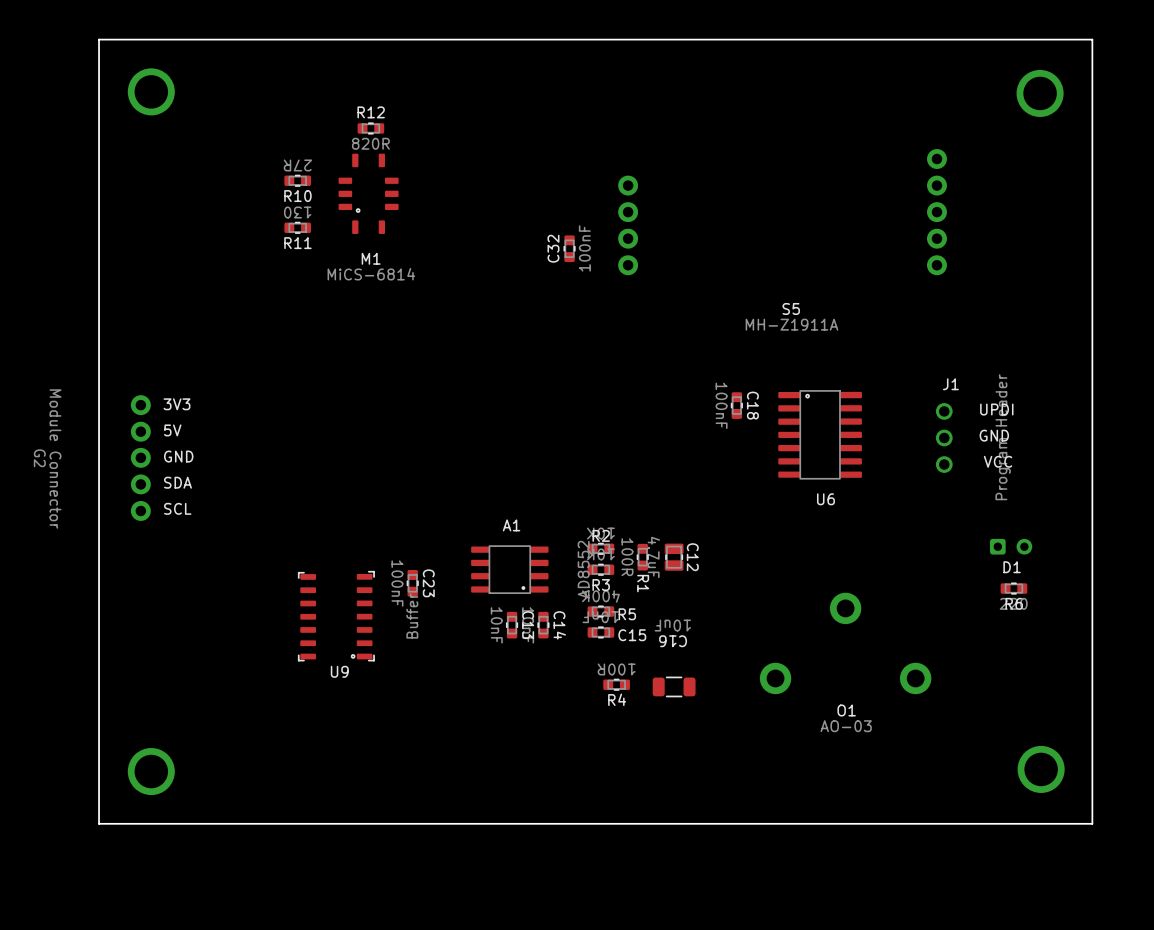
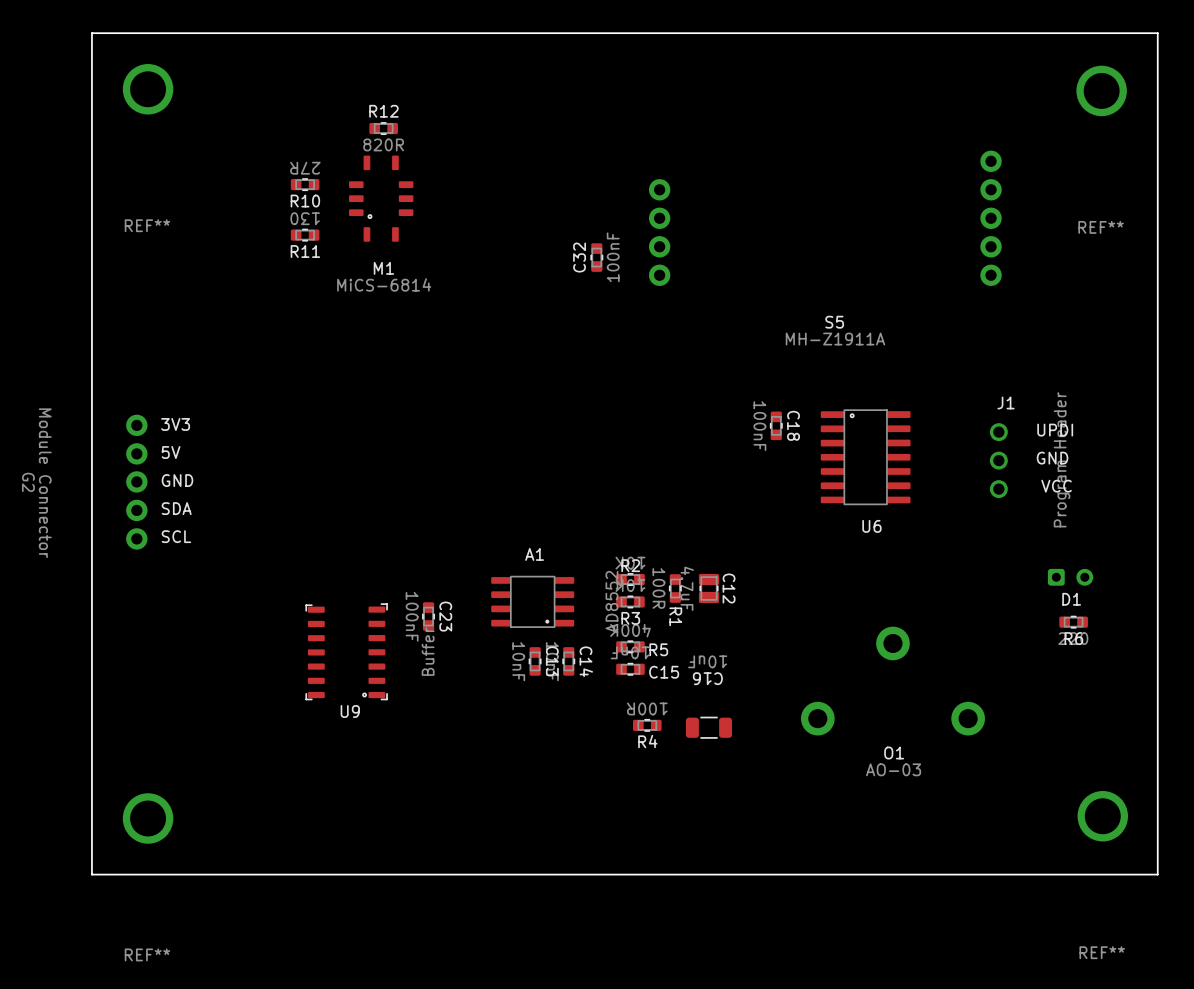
REF** name: none -> REF** (147, 225)
REF** name: none -> REF** (1101, 227)
REF** name: none -> REF** (1102, 952)
REF** name: none -> REF** (147, 954)

